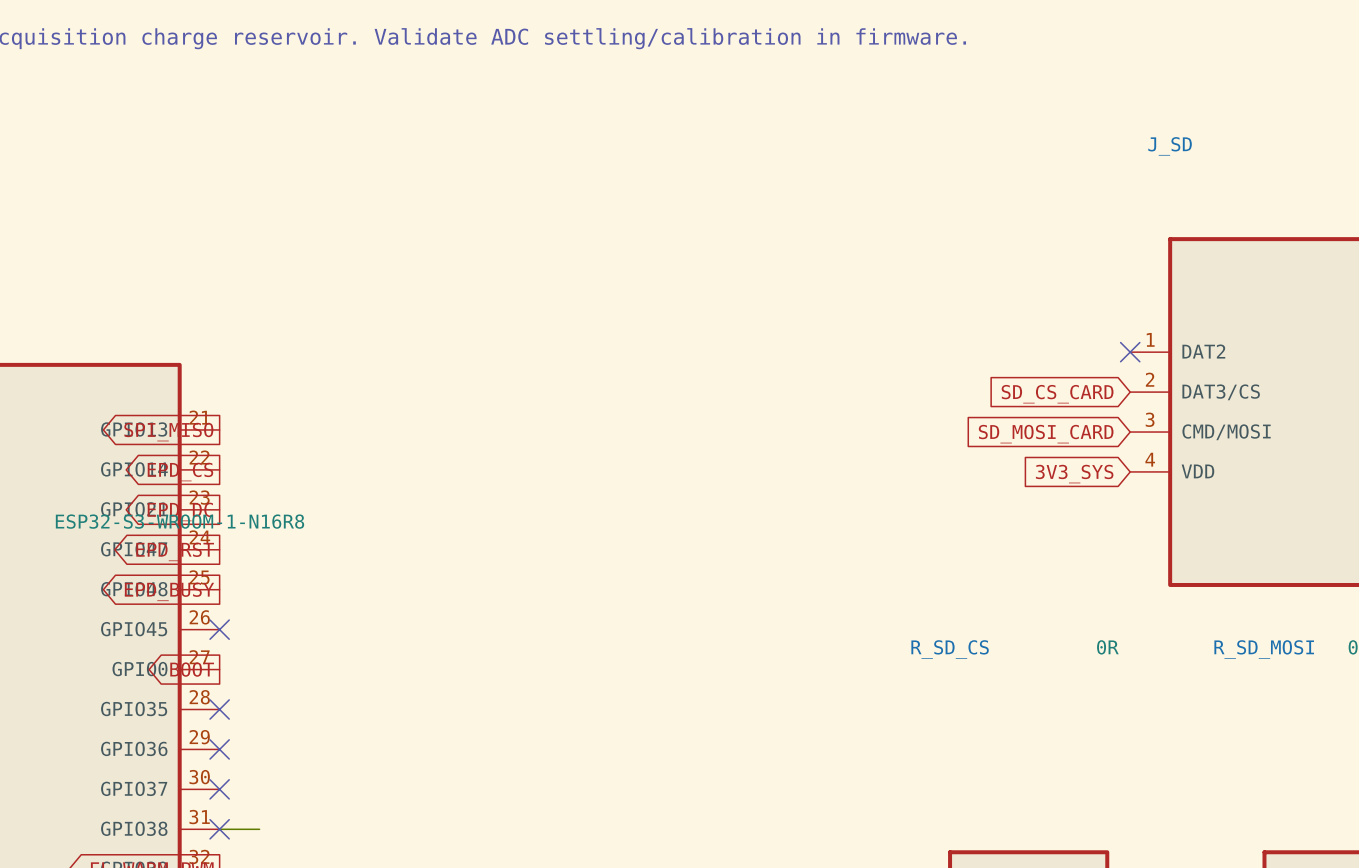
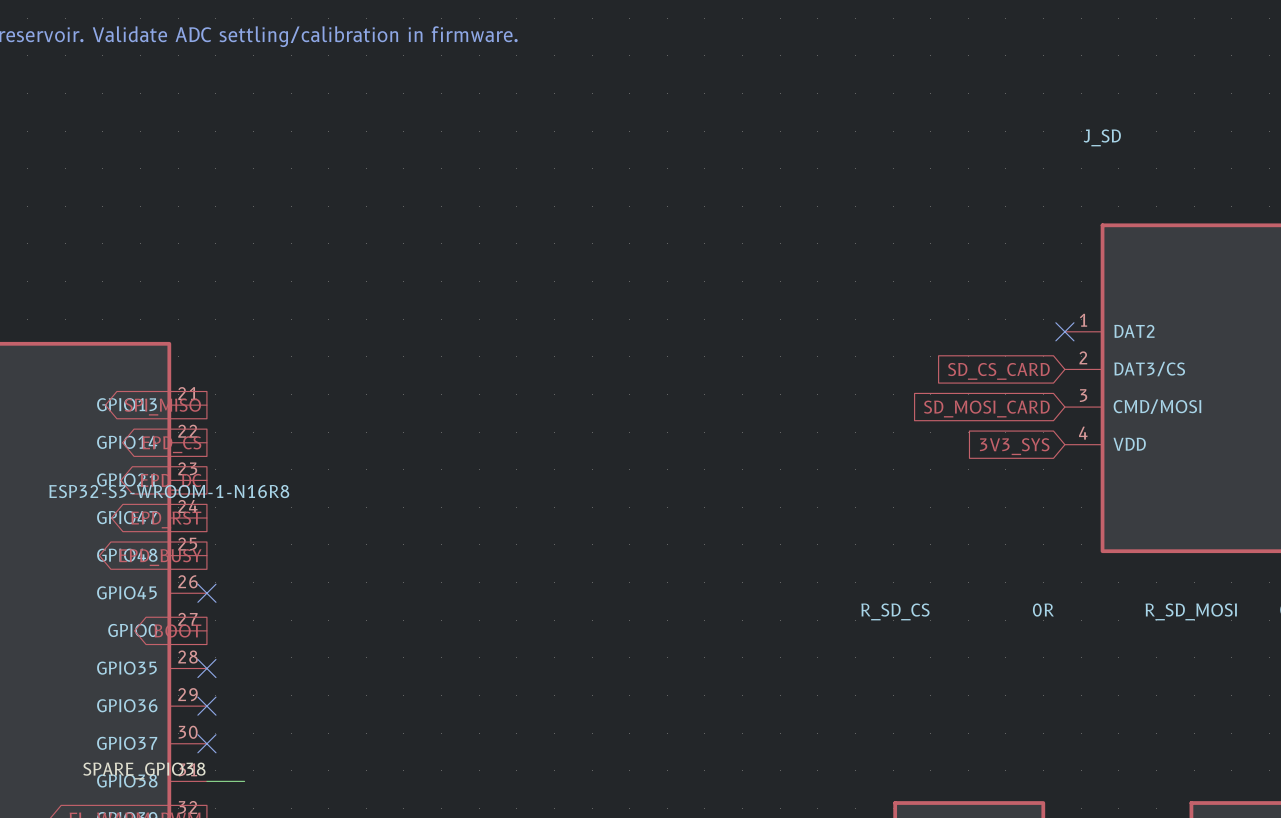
label: none -> SPARE_GPIO38 (144, 771)
no-connect mark: (219, 829) -> none

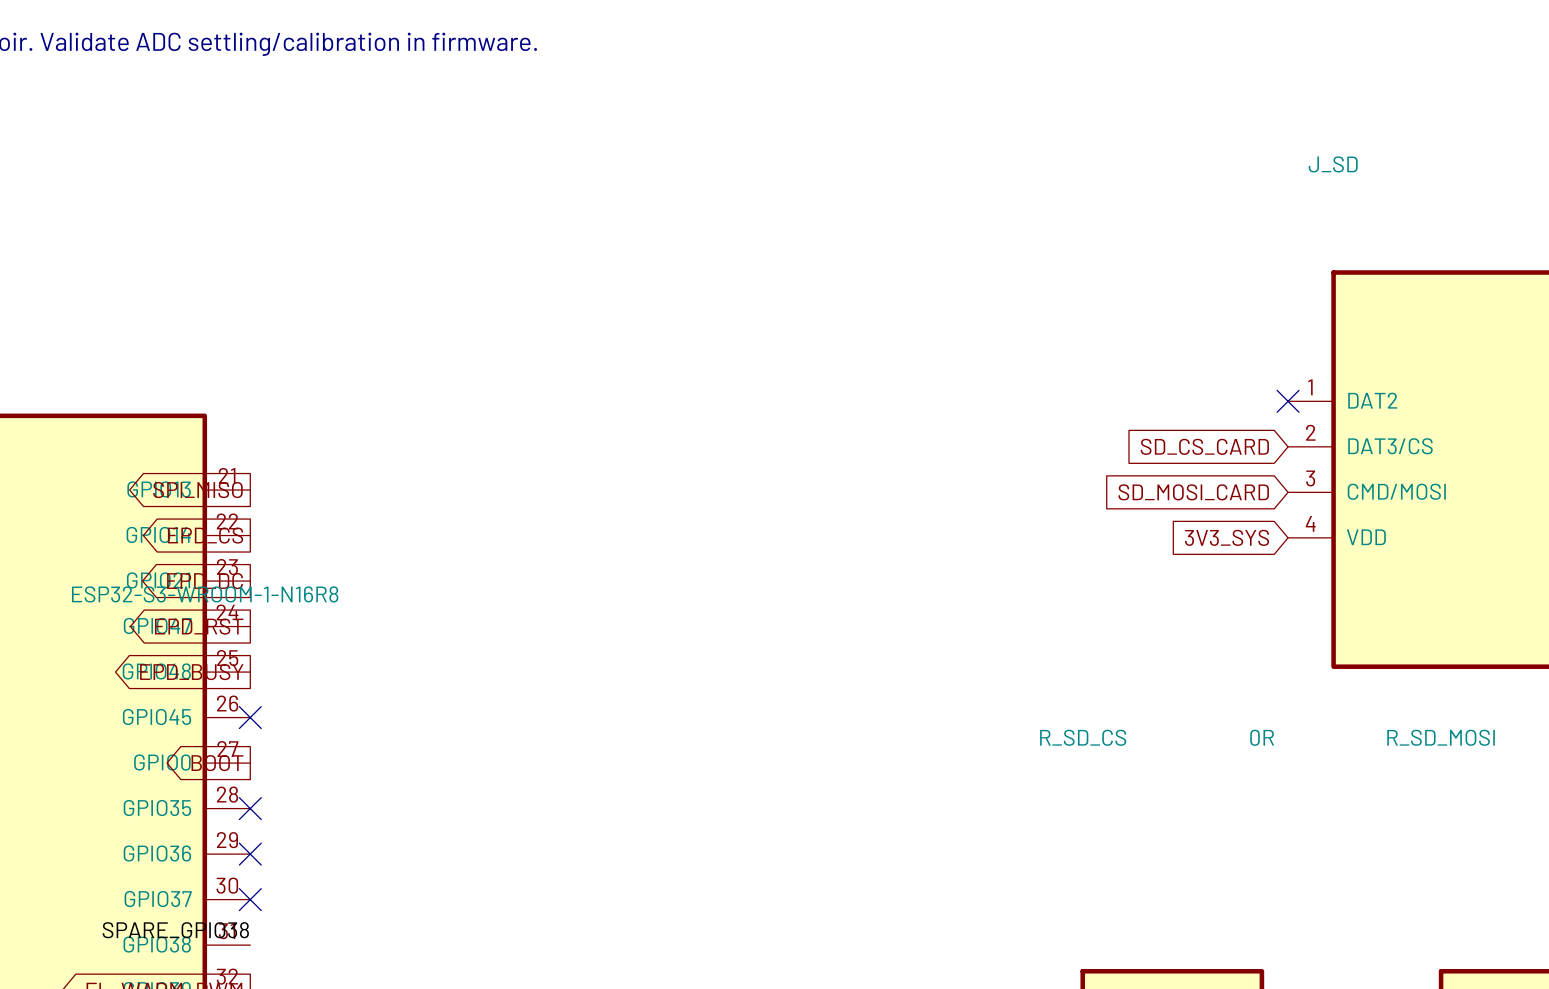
wire: (206, 781) (244, 781) -> none

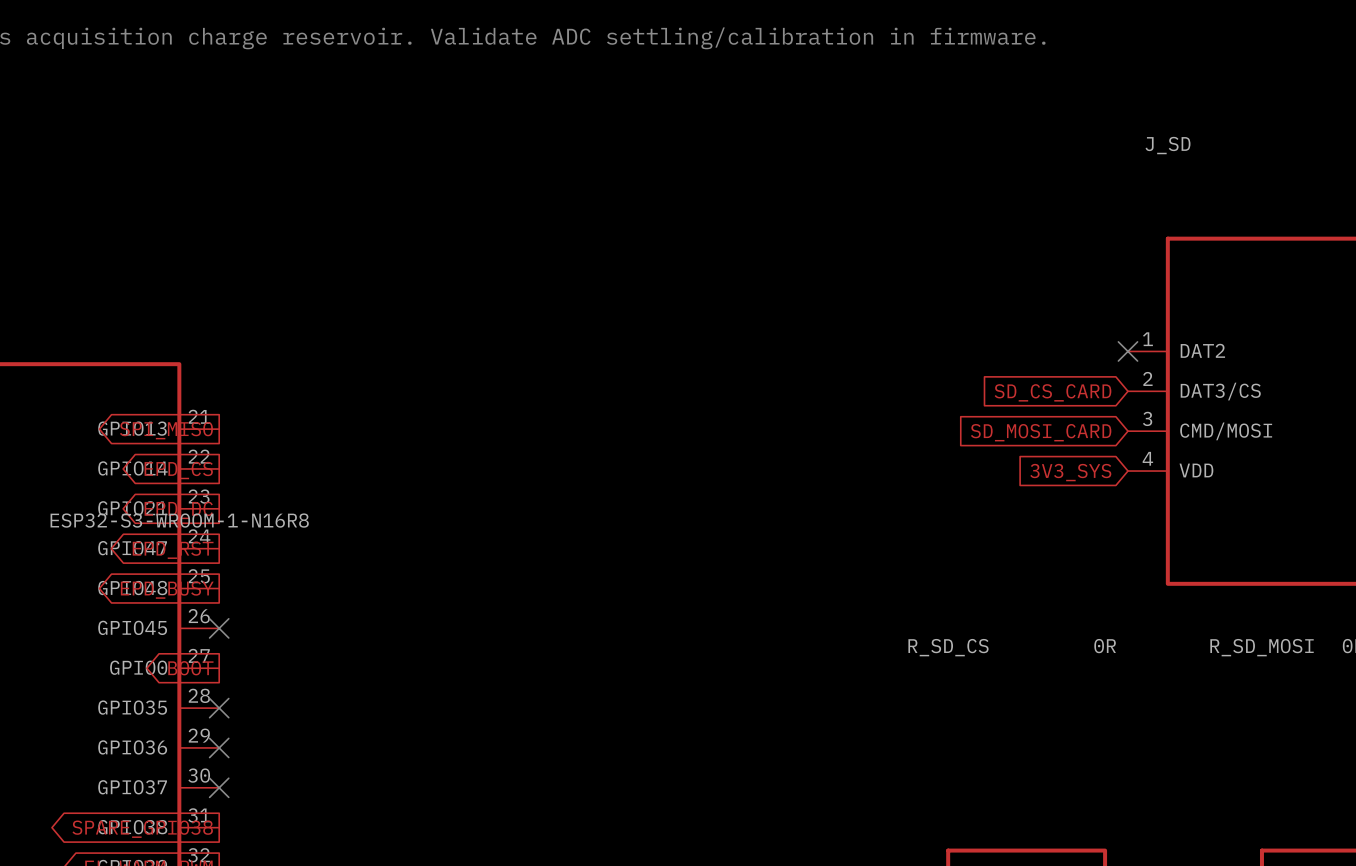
label: SPARE_GPIO38 (175, 930) -> none
global label: none -> SPARE_GPIO38 (142, 829)

